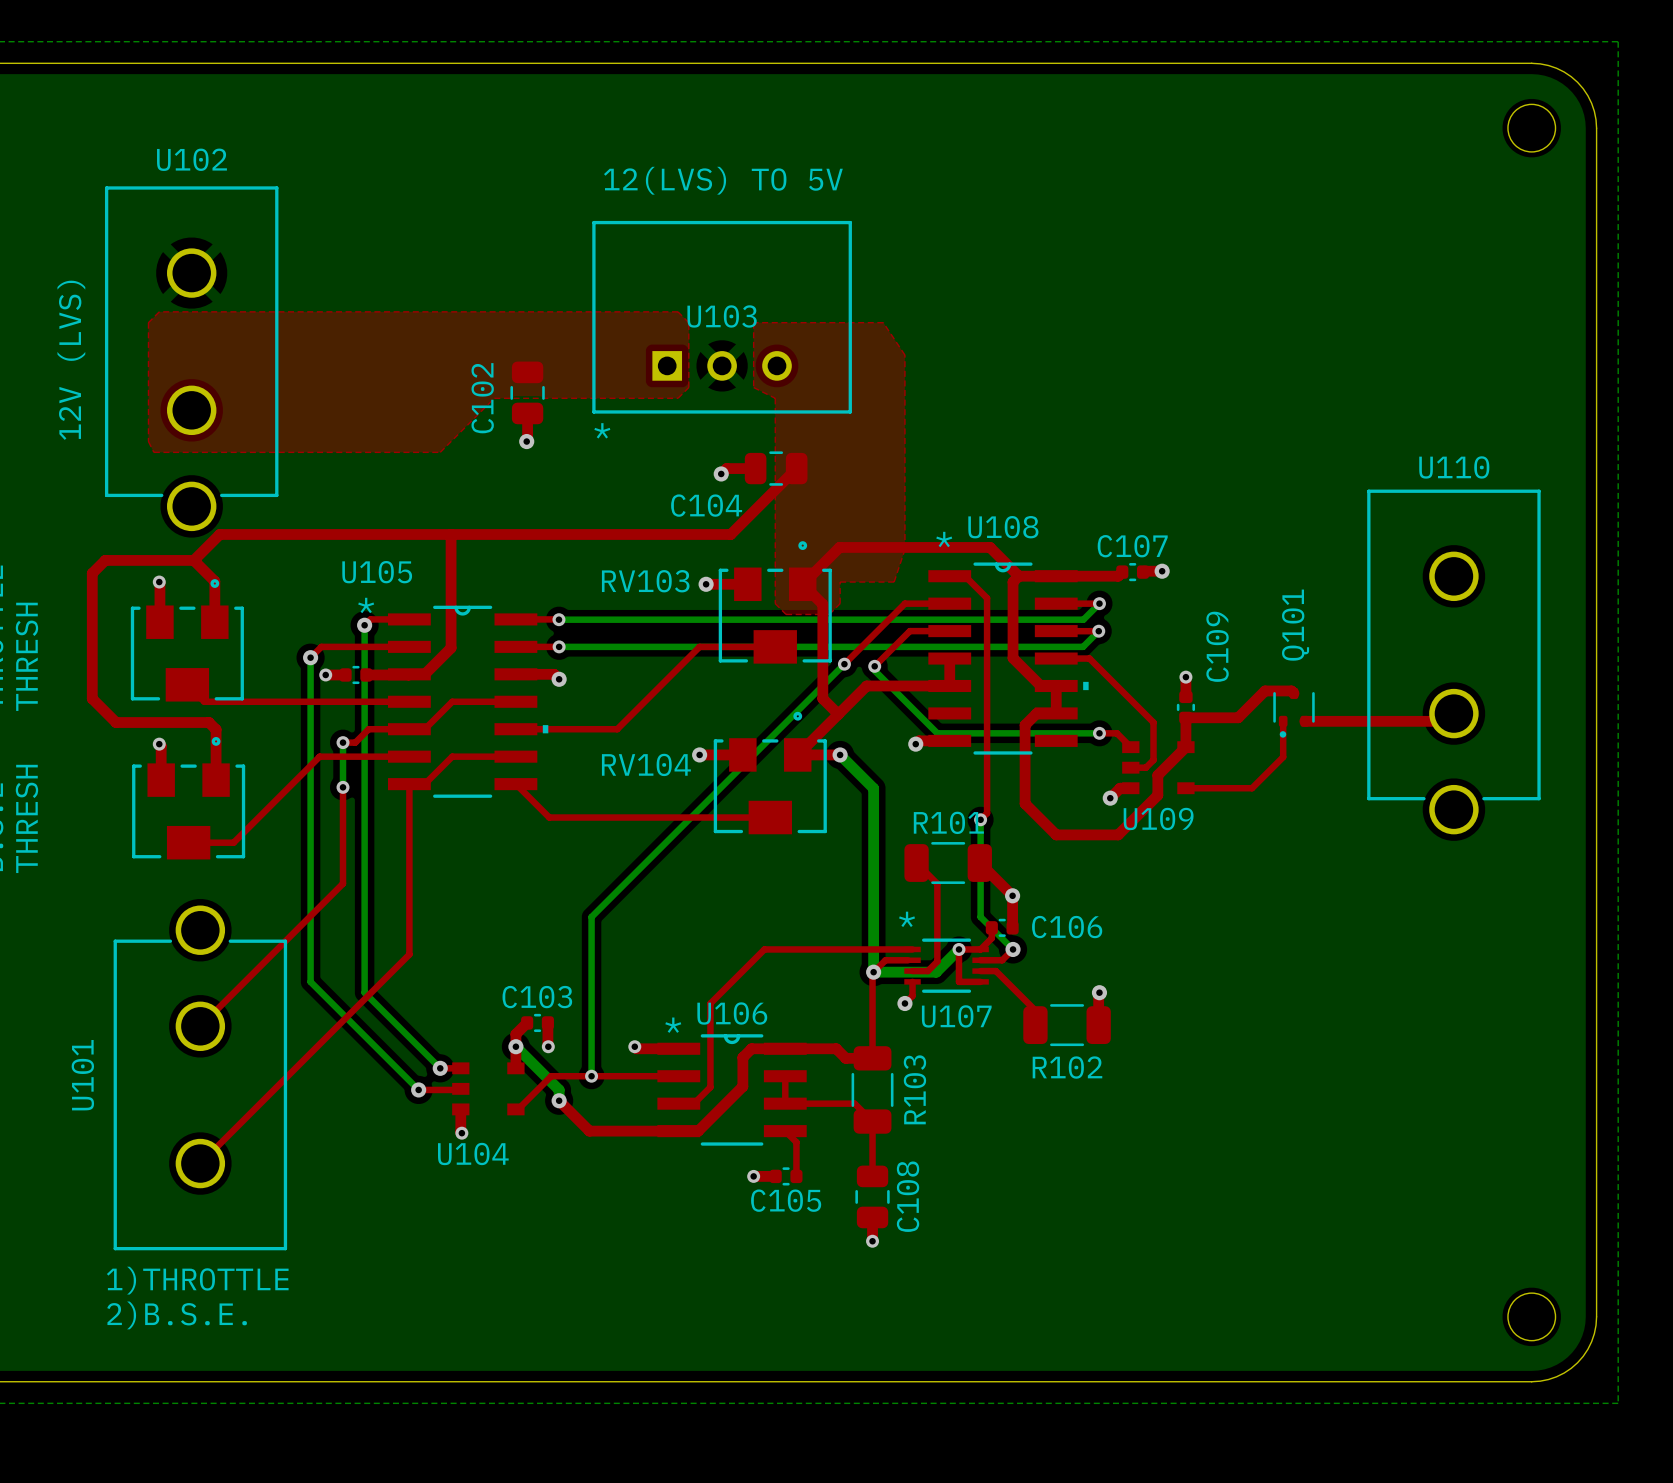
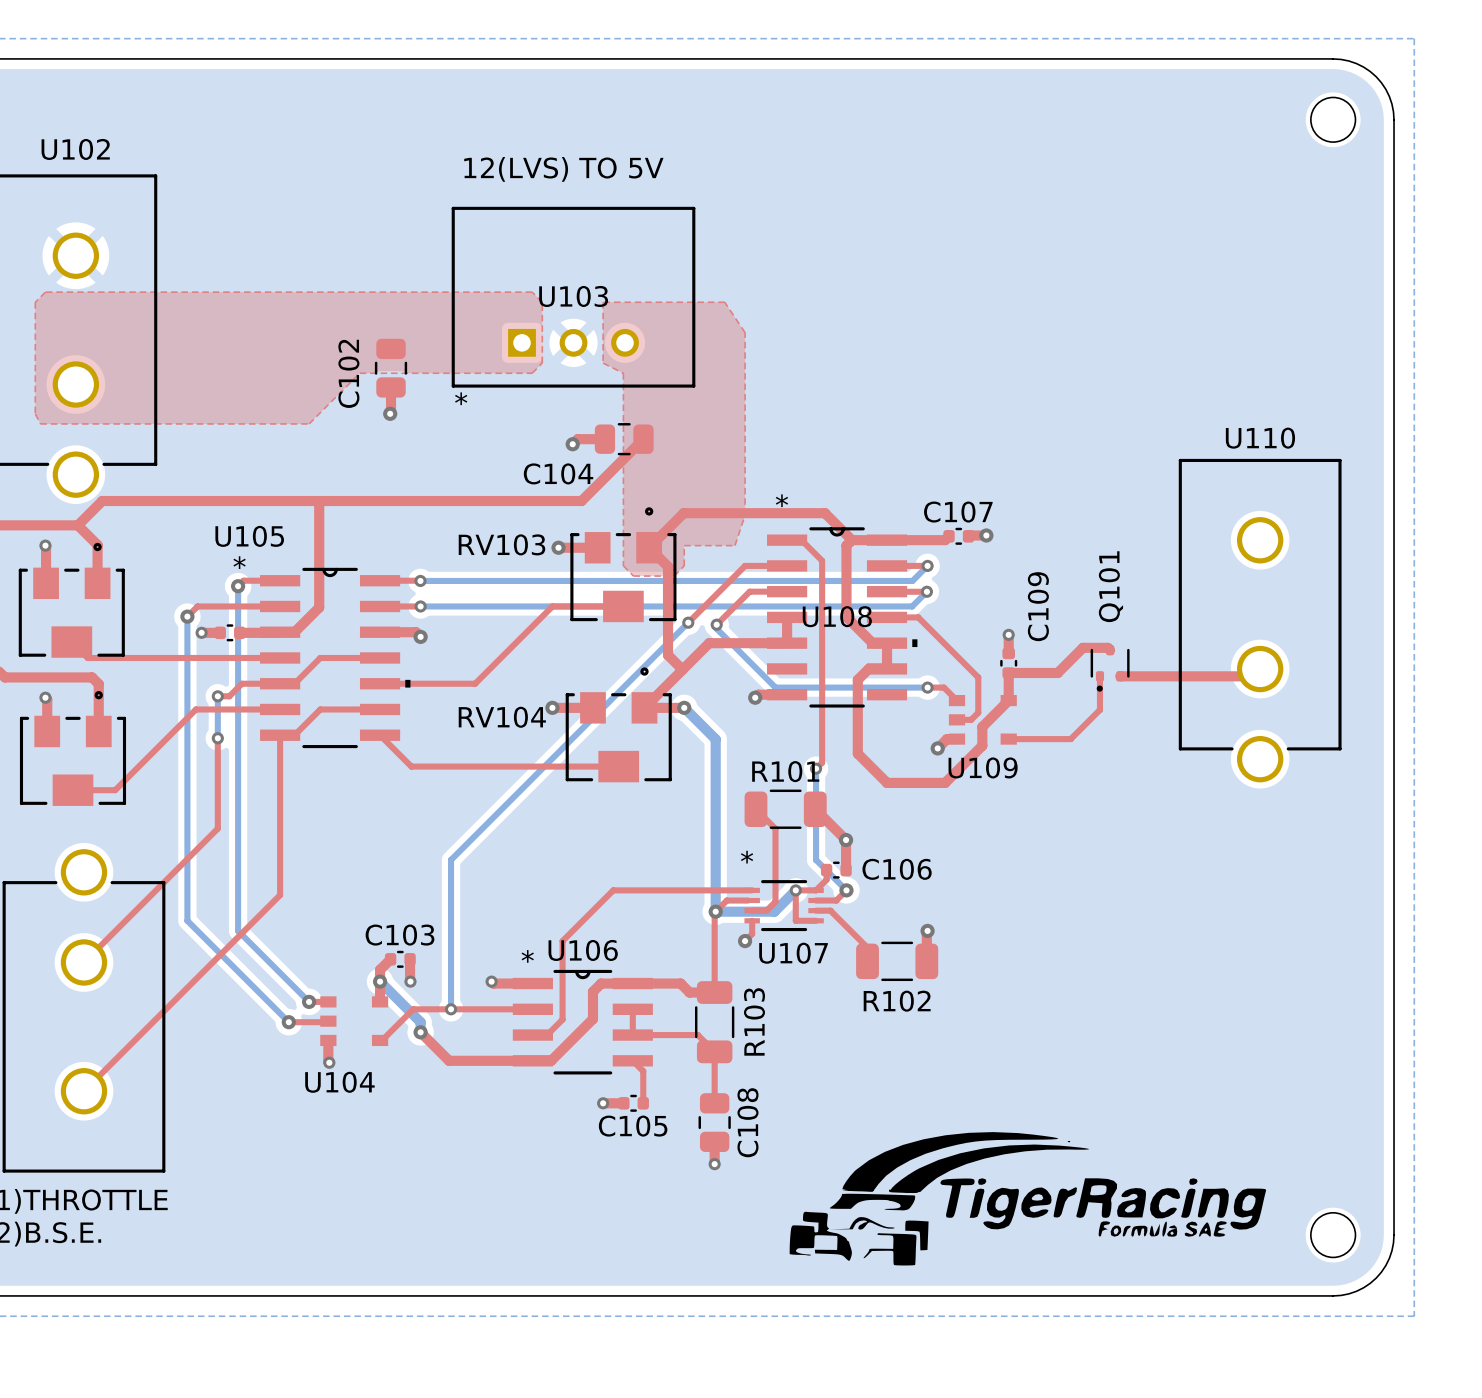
U108 name position: U108 (1003, 527) -> U108 (837, 616)
drawing: none -> [789, 1132, 1267, 1266]

